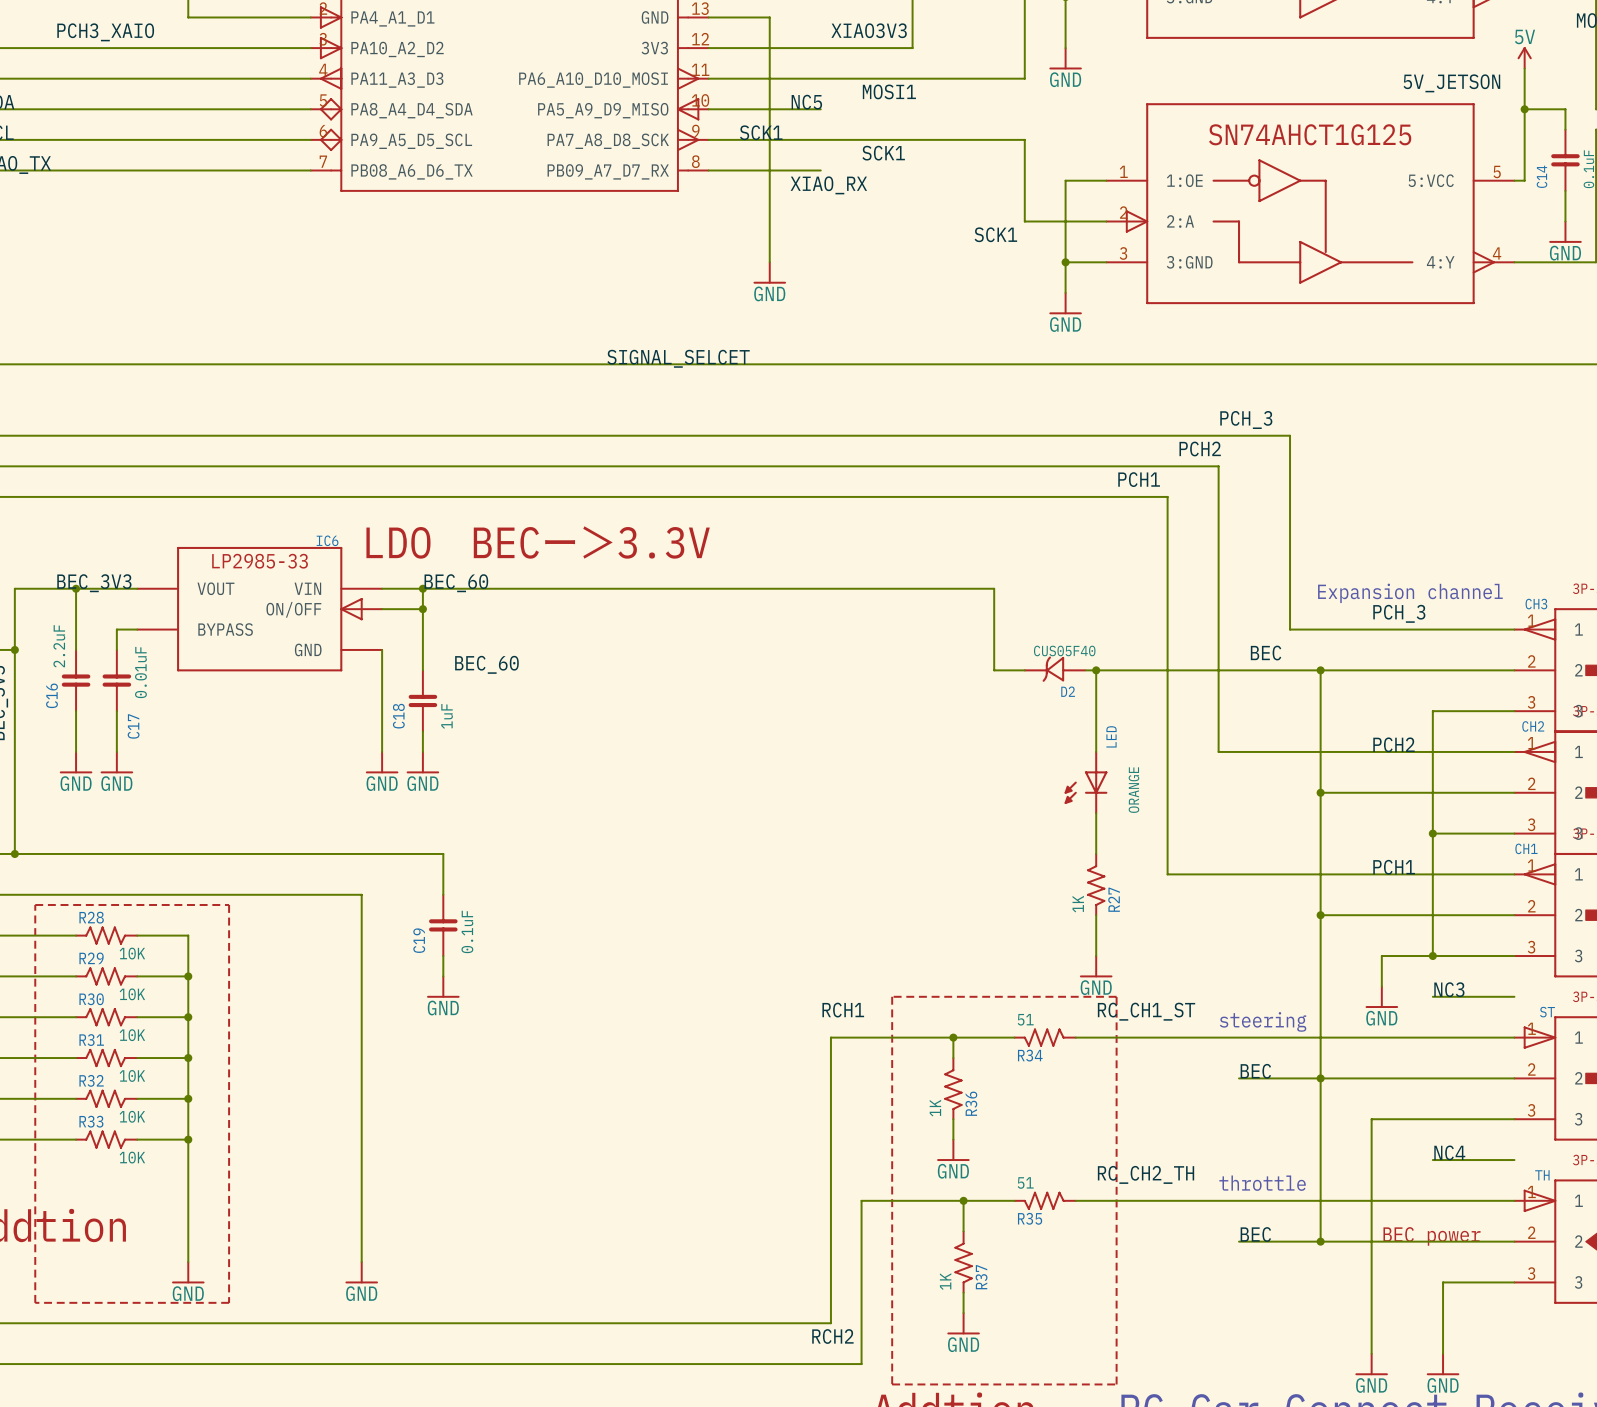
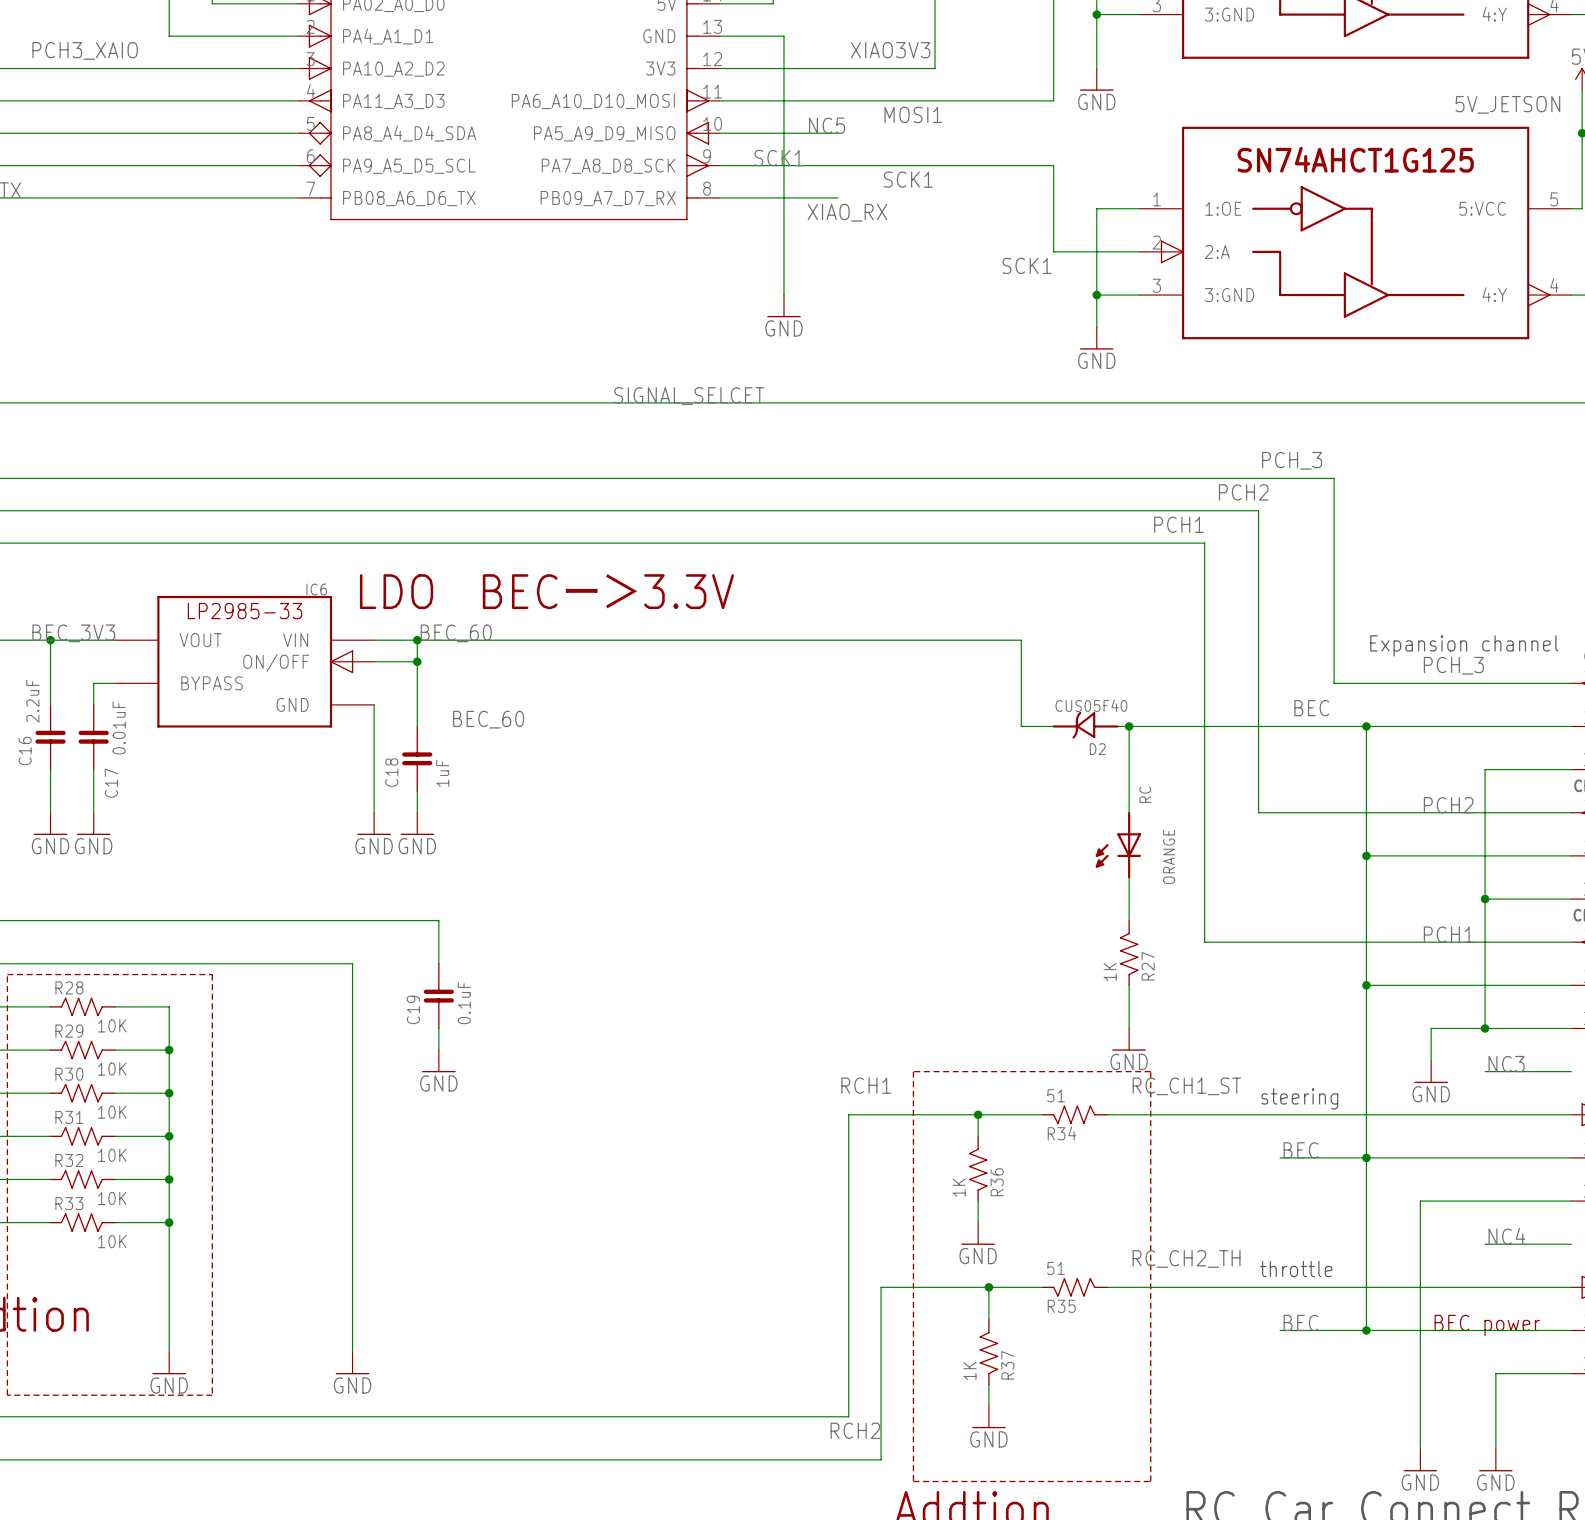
LED name: LED (1111, 736) -> RC (1145, 794)

